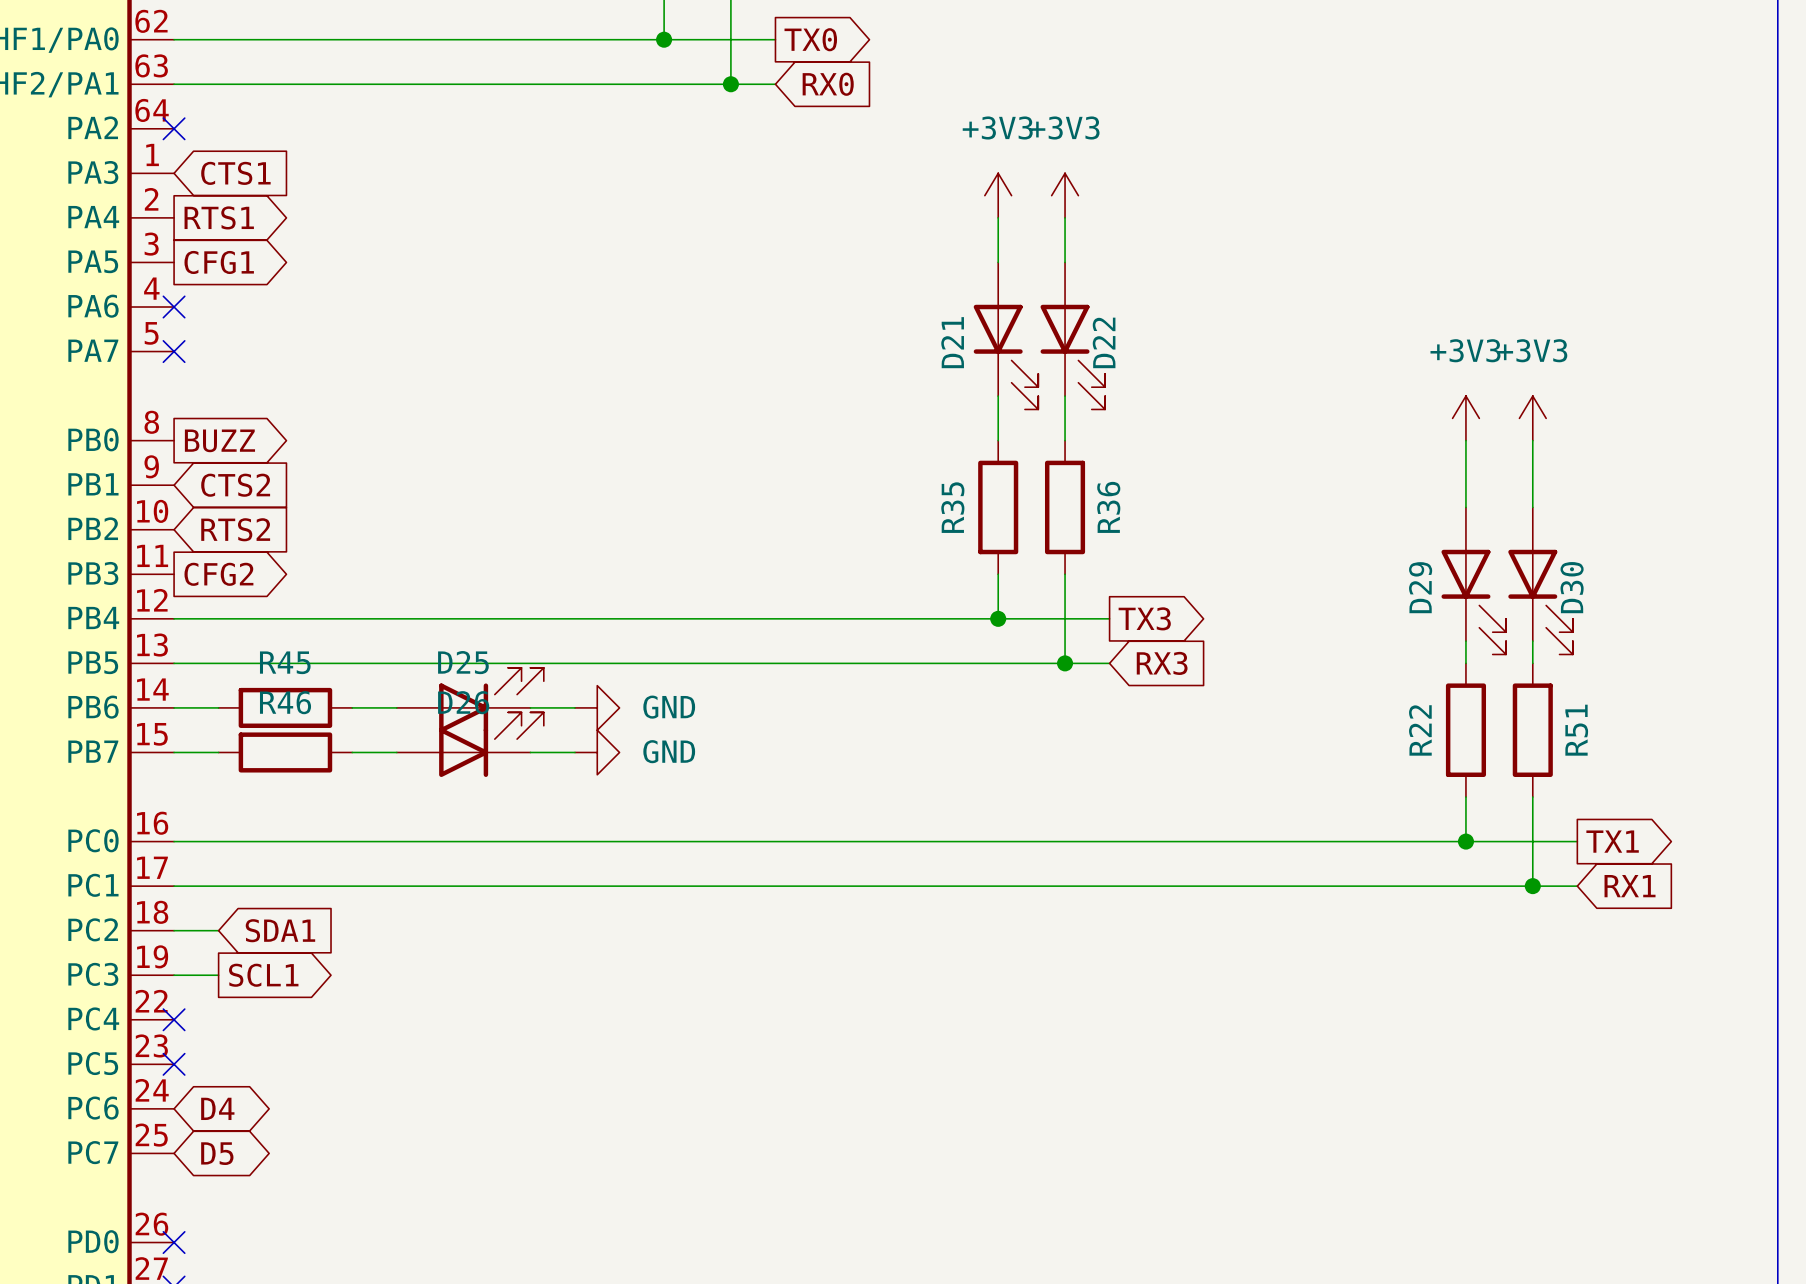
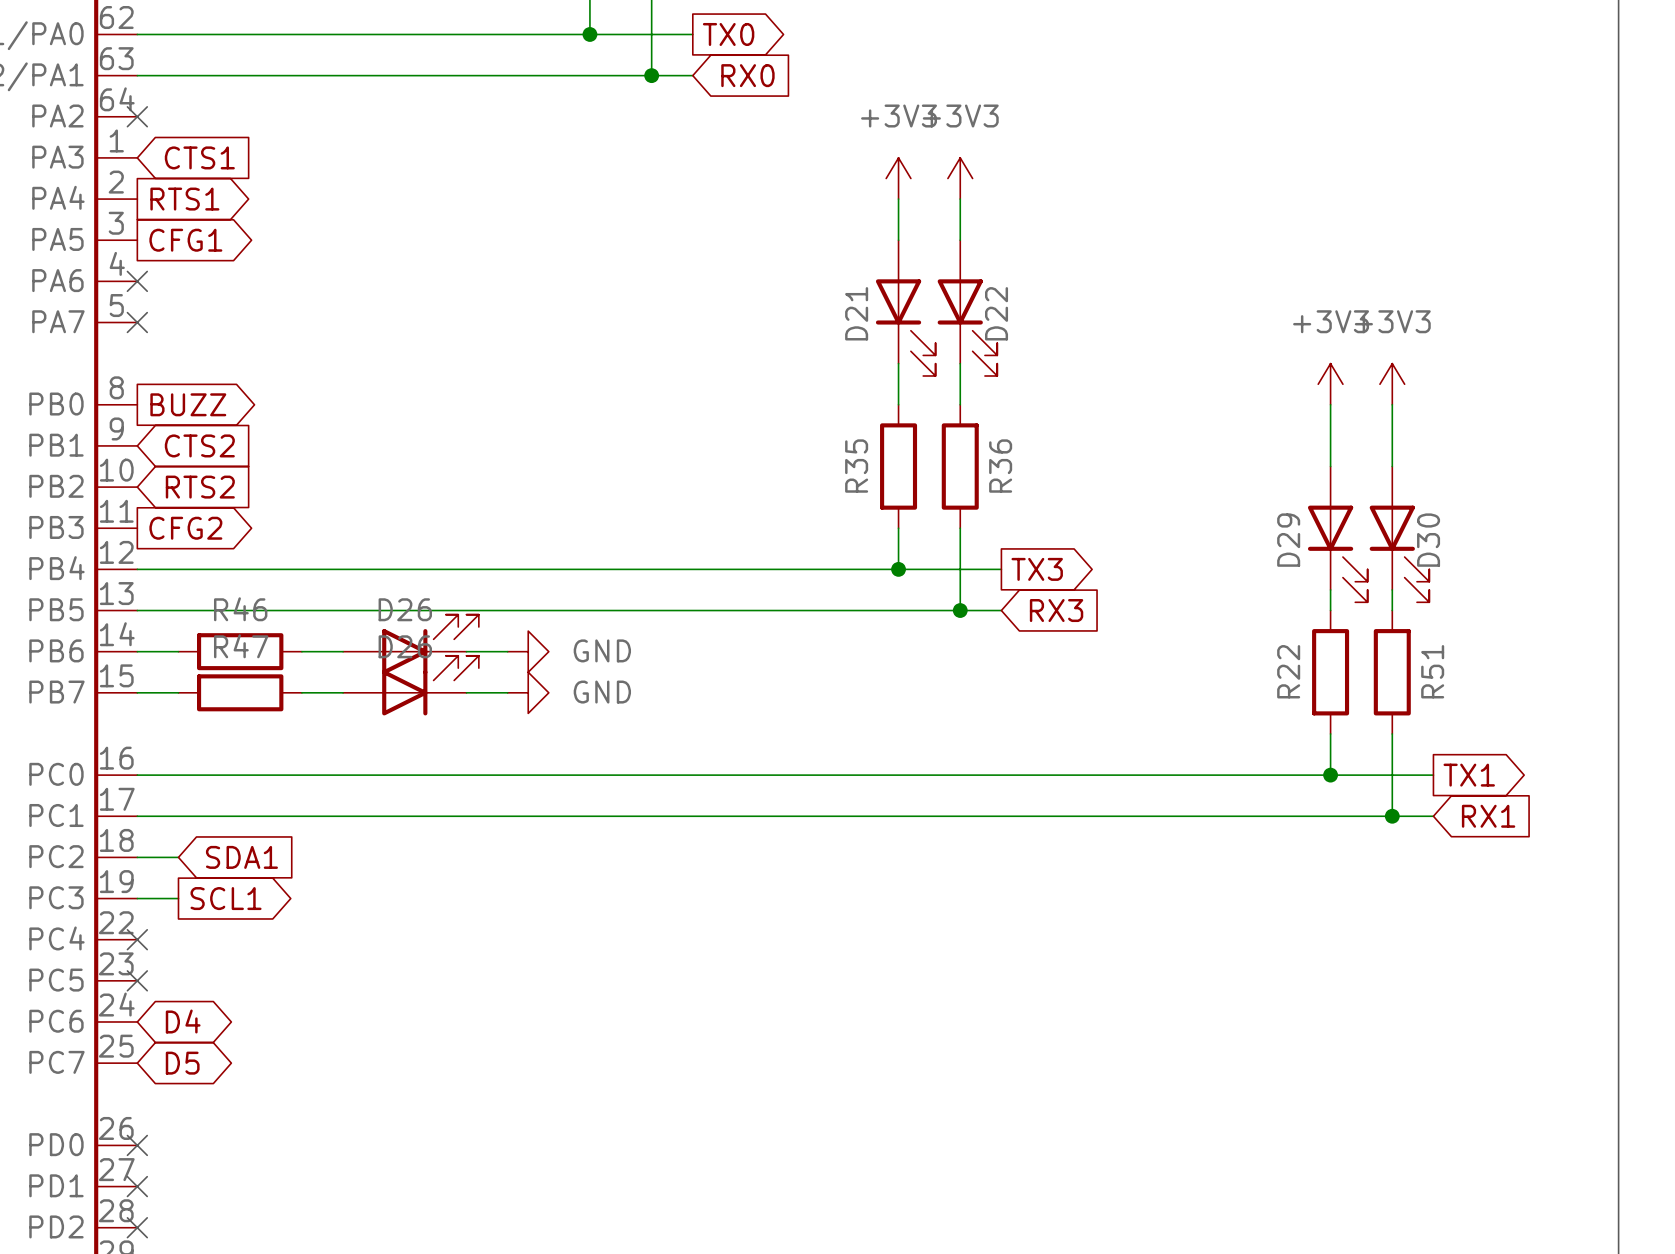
R45 name: R45 (285, 662) -> R46 (240, 609)
D25 name: D25 (463, 662) -> D26 (405, 609)
R46 name: R46 (285, 702) -> R47 (241, 646)

